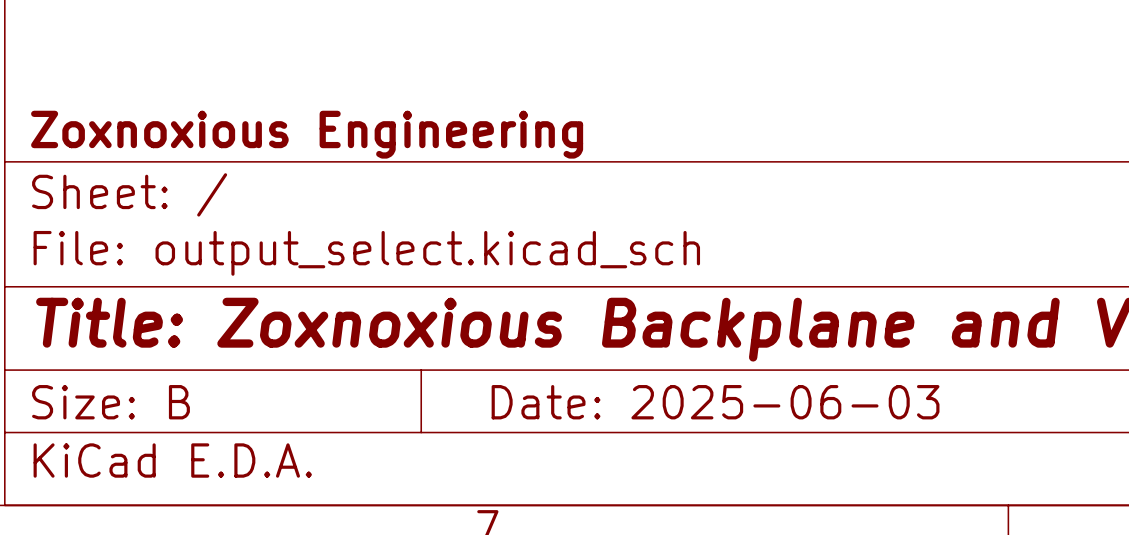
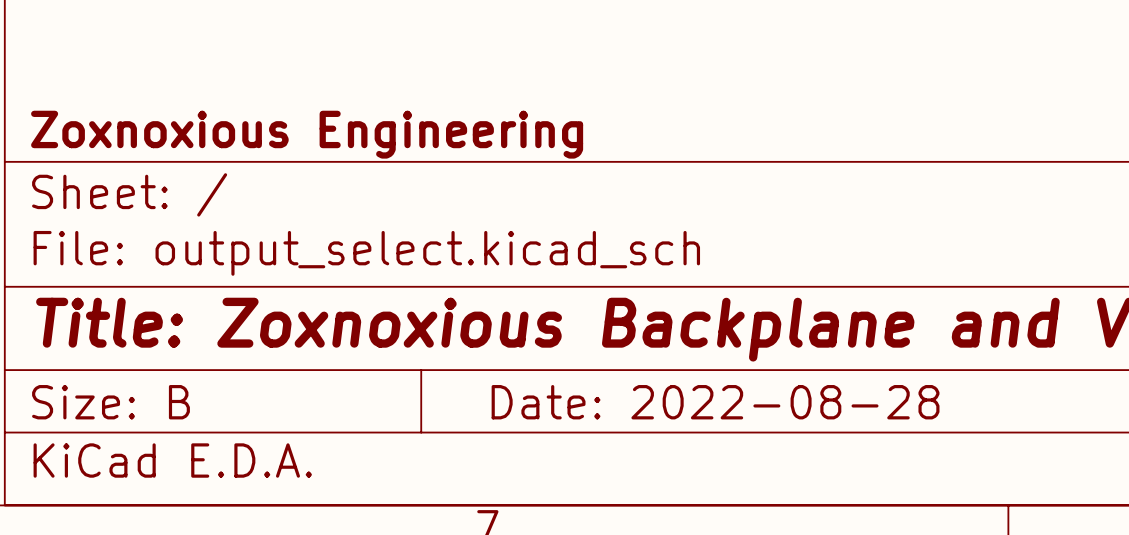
title block: Date: 2025-06-03 (715, 402) -> Date: 2022-08-28 (715, 402)

